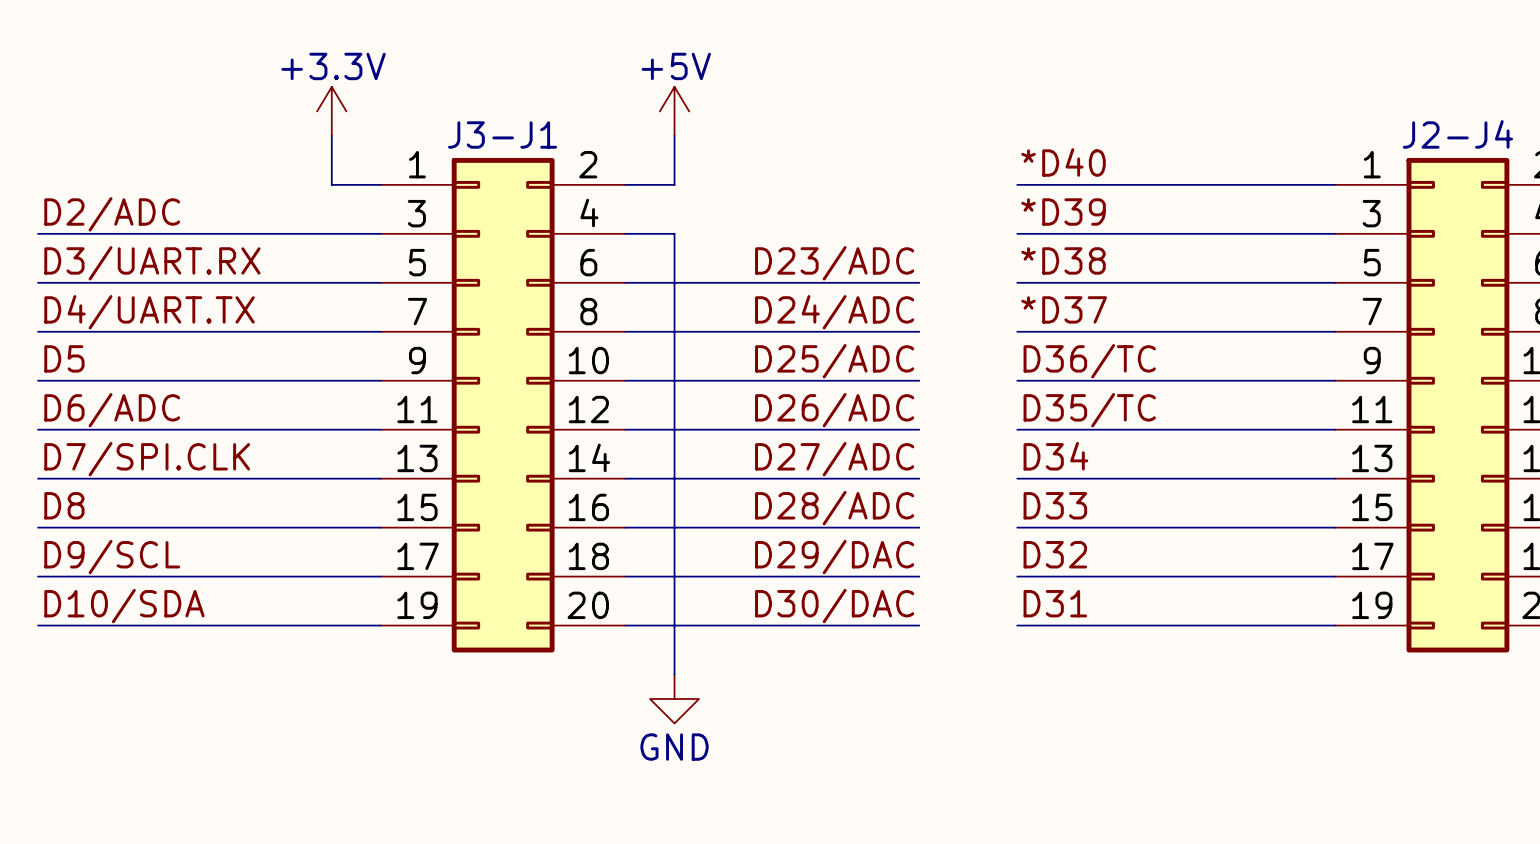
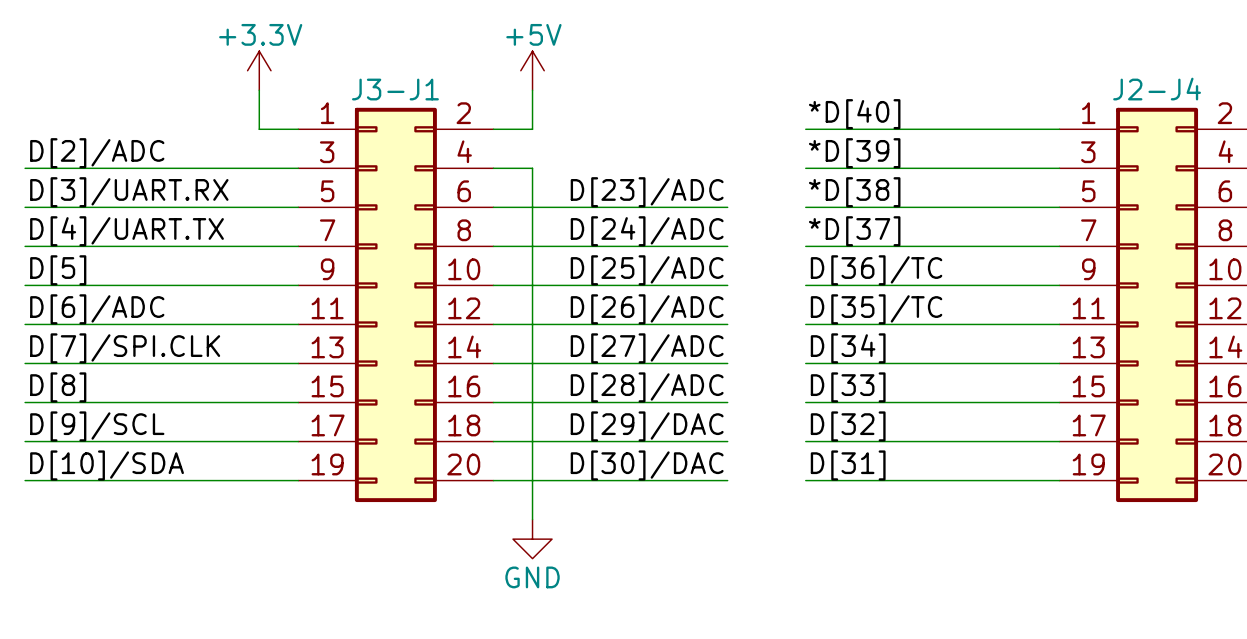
label: *D40 (1063, 162) -> *D[40] (854, 114)
label: *D39 (1063, 211) -> *D[39] (854, 153)
label: D2/ADC (112, 214) -> D[2]/ADC (97, 153)
label: *D38 (1063, 260) -> *D[38] (854, 192)
label: D3/UART.RX (152, 263) -> D[3]/UART.RX (129, 192)
label: D23/ADC (834, 263) -> D[23]/ADC (647, 192)
label: *D37 (1064, 309) -> *D[37] (854, 231)
label: D4/UART.TX (149, 312) -> D[4]/UART.TX (127, 231)
label: D24/ADC (834, 312) -> D[24]/ADC (647, 231)
label: D5 (64, 358) -> D[5] (58, 270)
label: D25/ADC (834, 361) -> D[25]/ADC (647, 270)
label: D36/TC (1089, 361) -> D[36]/TC (876, 270)
label: D6/ADC (112, 410) -> D[6]/ADC (97, 309)
label: D26/ADC (834, 410) -> D[26]/ADC (647, 309)
label: D35/TC (1089, 410) -> D[35]/TC (876, 309)
label: D34 (1055, 456) -> D[34] (848, 348)
label: D7/SPI.CLK (147, 459) -> D[7]/SPI.CLK (125, 348)
label: D27/ADC (834, 459) -> D[27]/ADC (647, 348)
label: D8 (64, 505) -> D[8] (58, 387)
label: D33 (1055, 505) -> D[33] (848, 387)
label: D28/ADC (834, 508) -> D[28]/ADC (647, 387)
label: D32 (1055, 554) -> D[32] (848, 426)
label: D9/SCL (112, 557) -> D[9]/SCL (97, 426)
label: D29/DAC (834, 557) -> D[29]/DAC (647, 426)
label: D31 (1055, 603) -> D[31] (848, 465)
label: D10/SDA (124, 606) -> D[10]/SDA (107, 465)
label: D30/DAC (834, 606) -> D[30]/DAC (647, 465)

